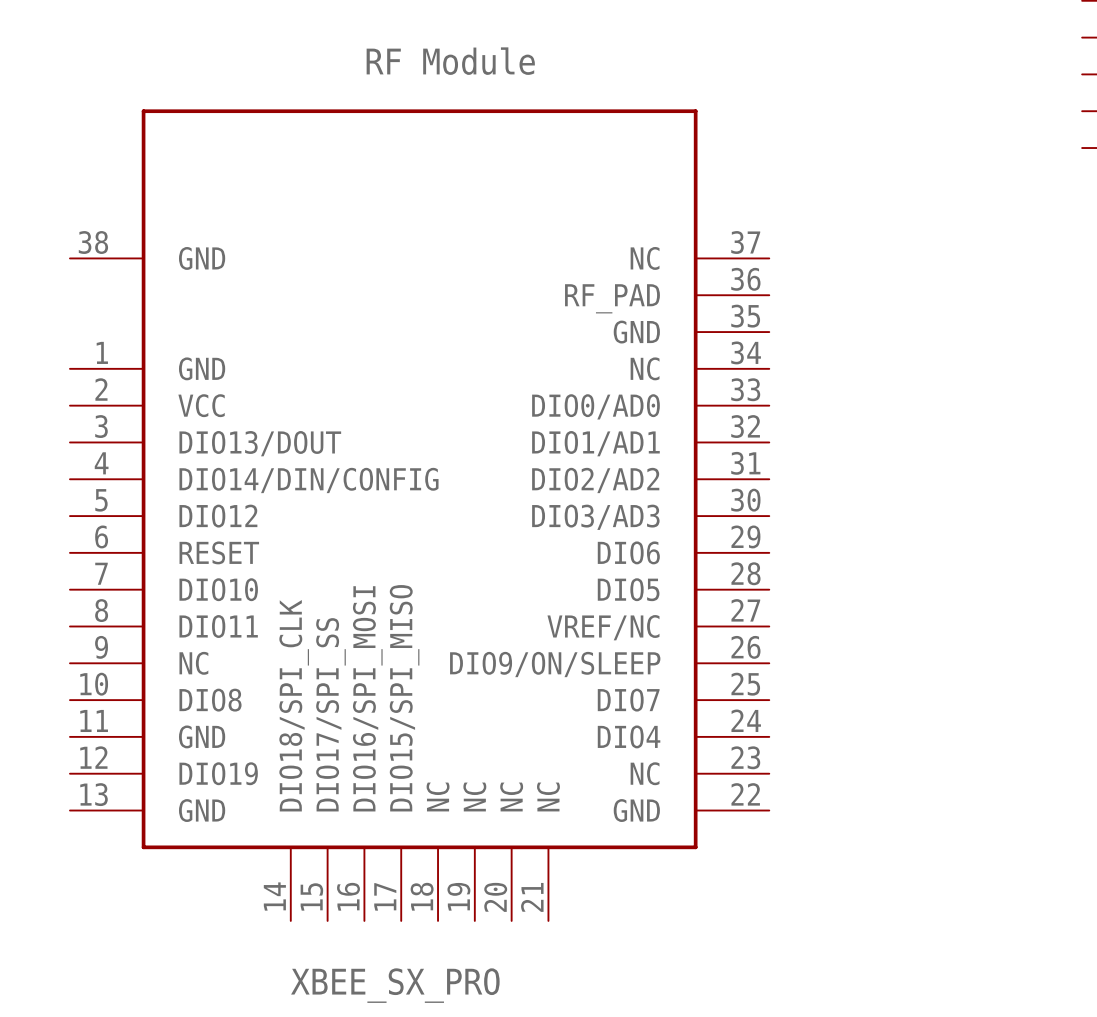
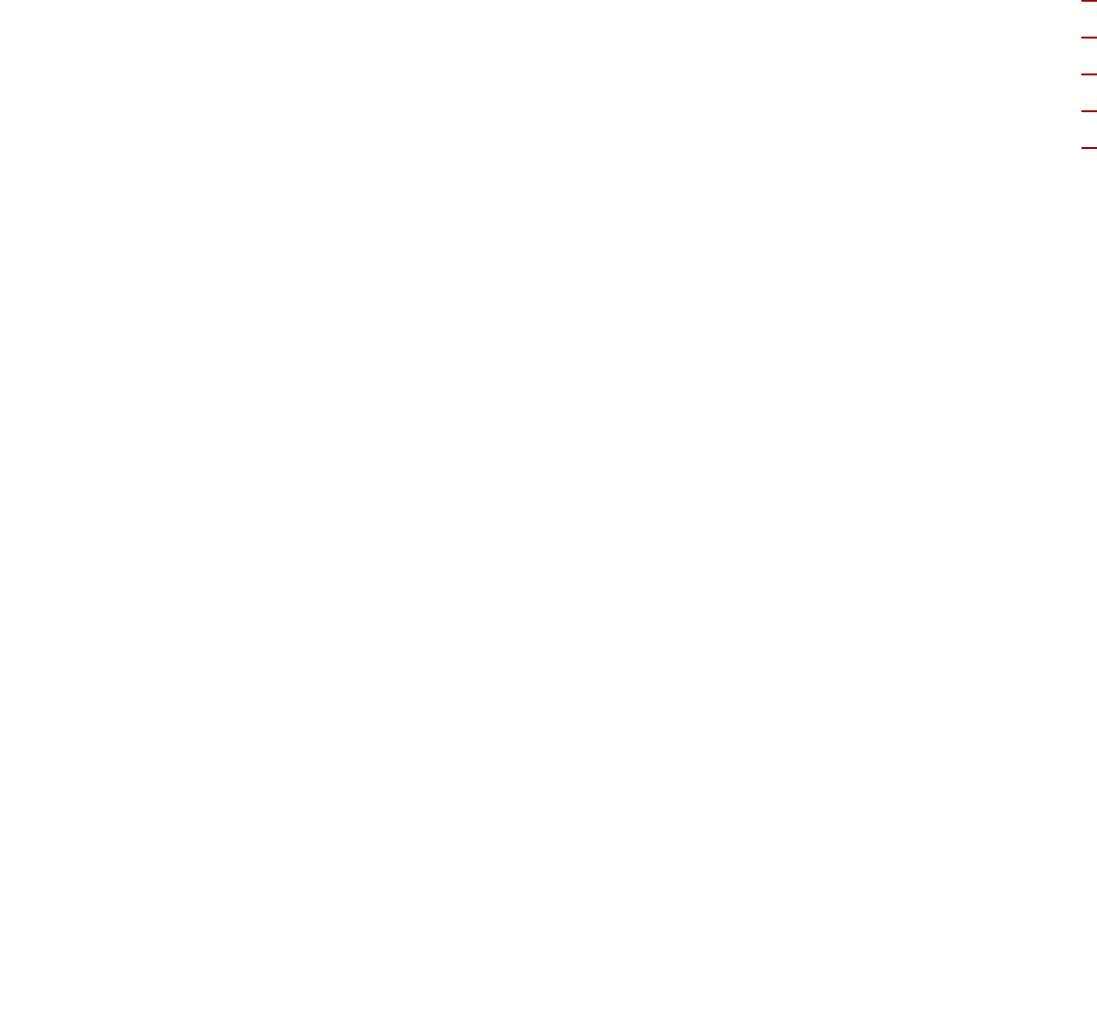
part: (419, 515) -> none

